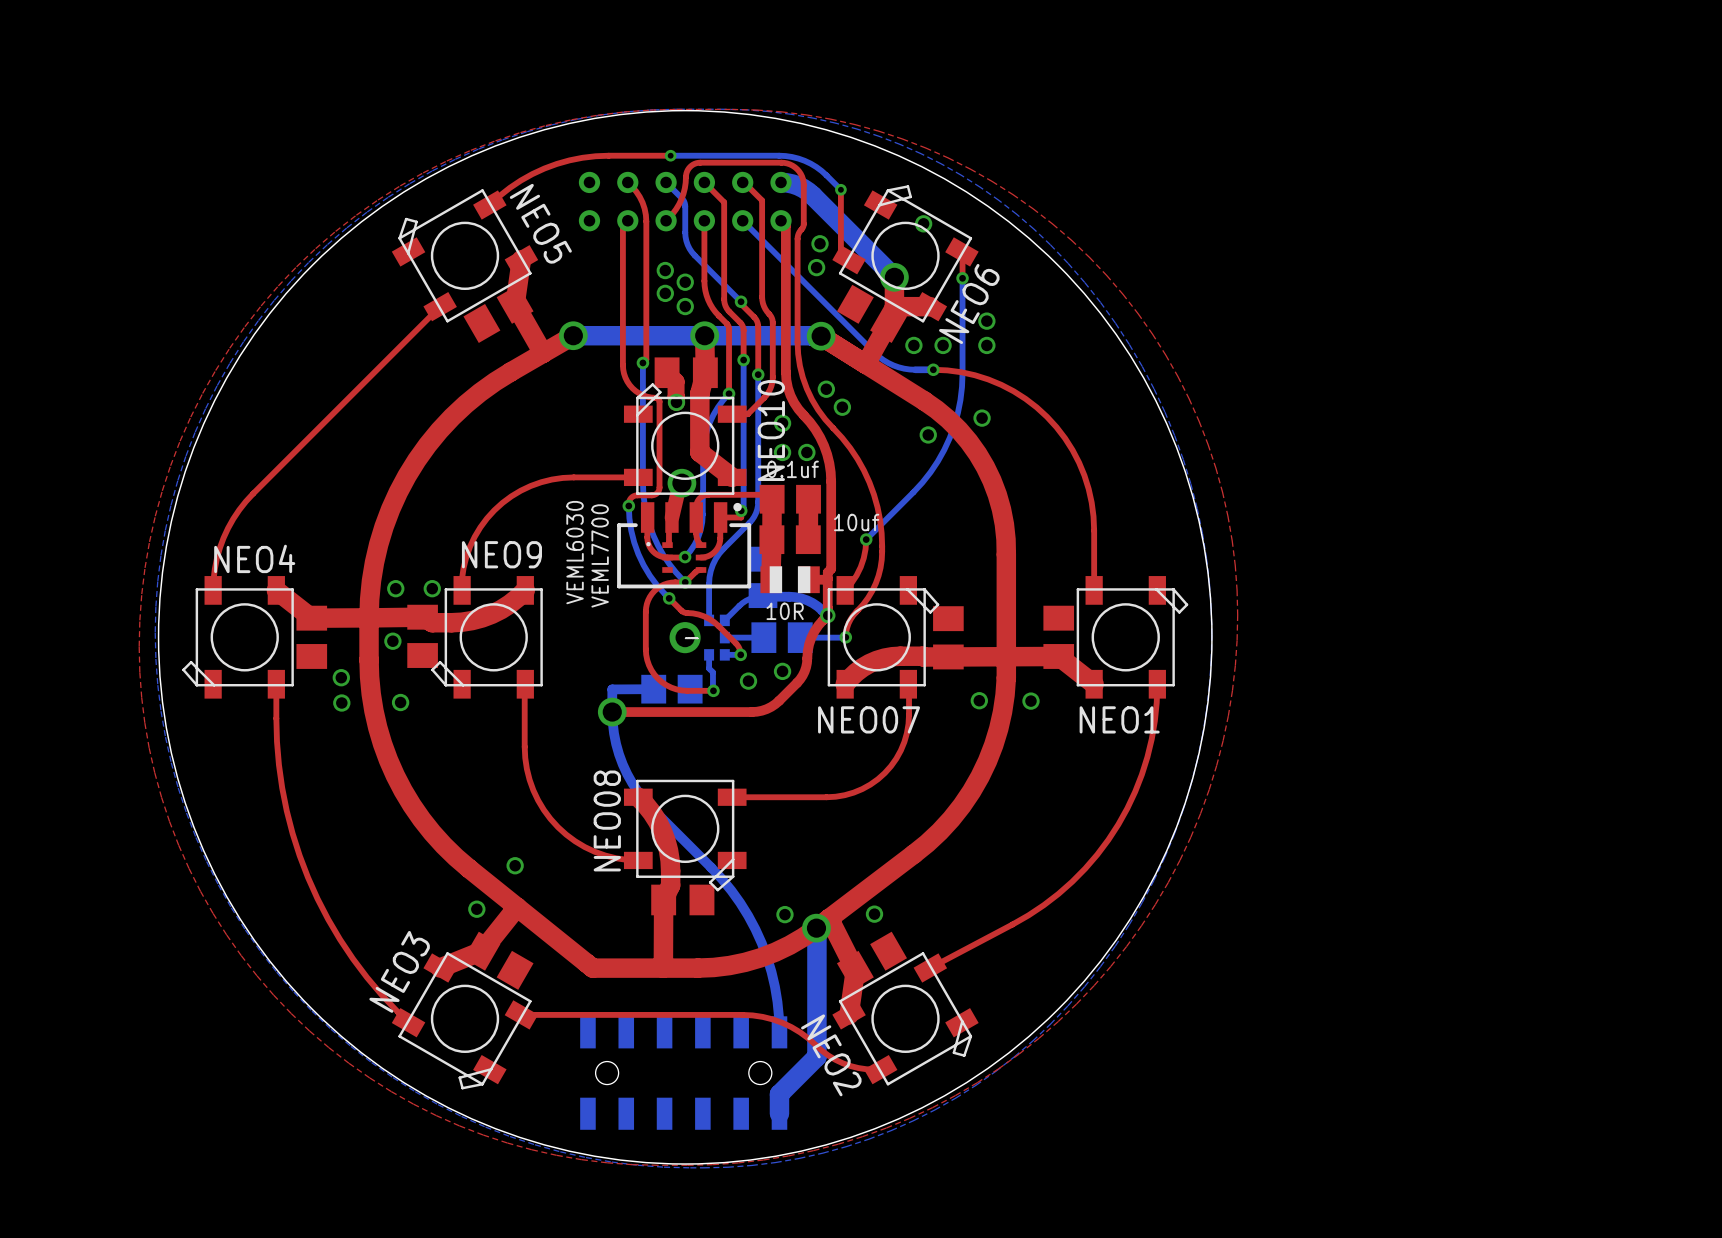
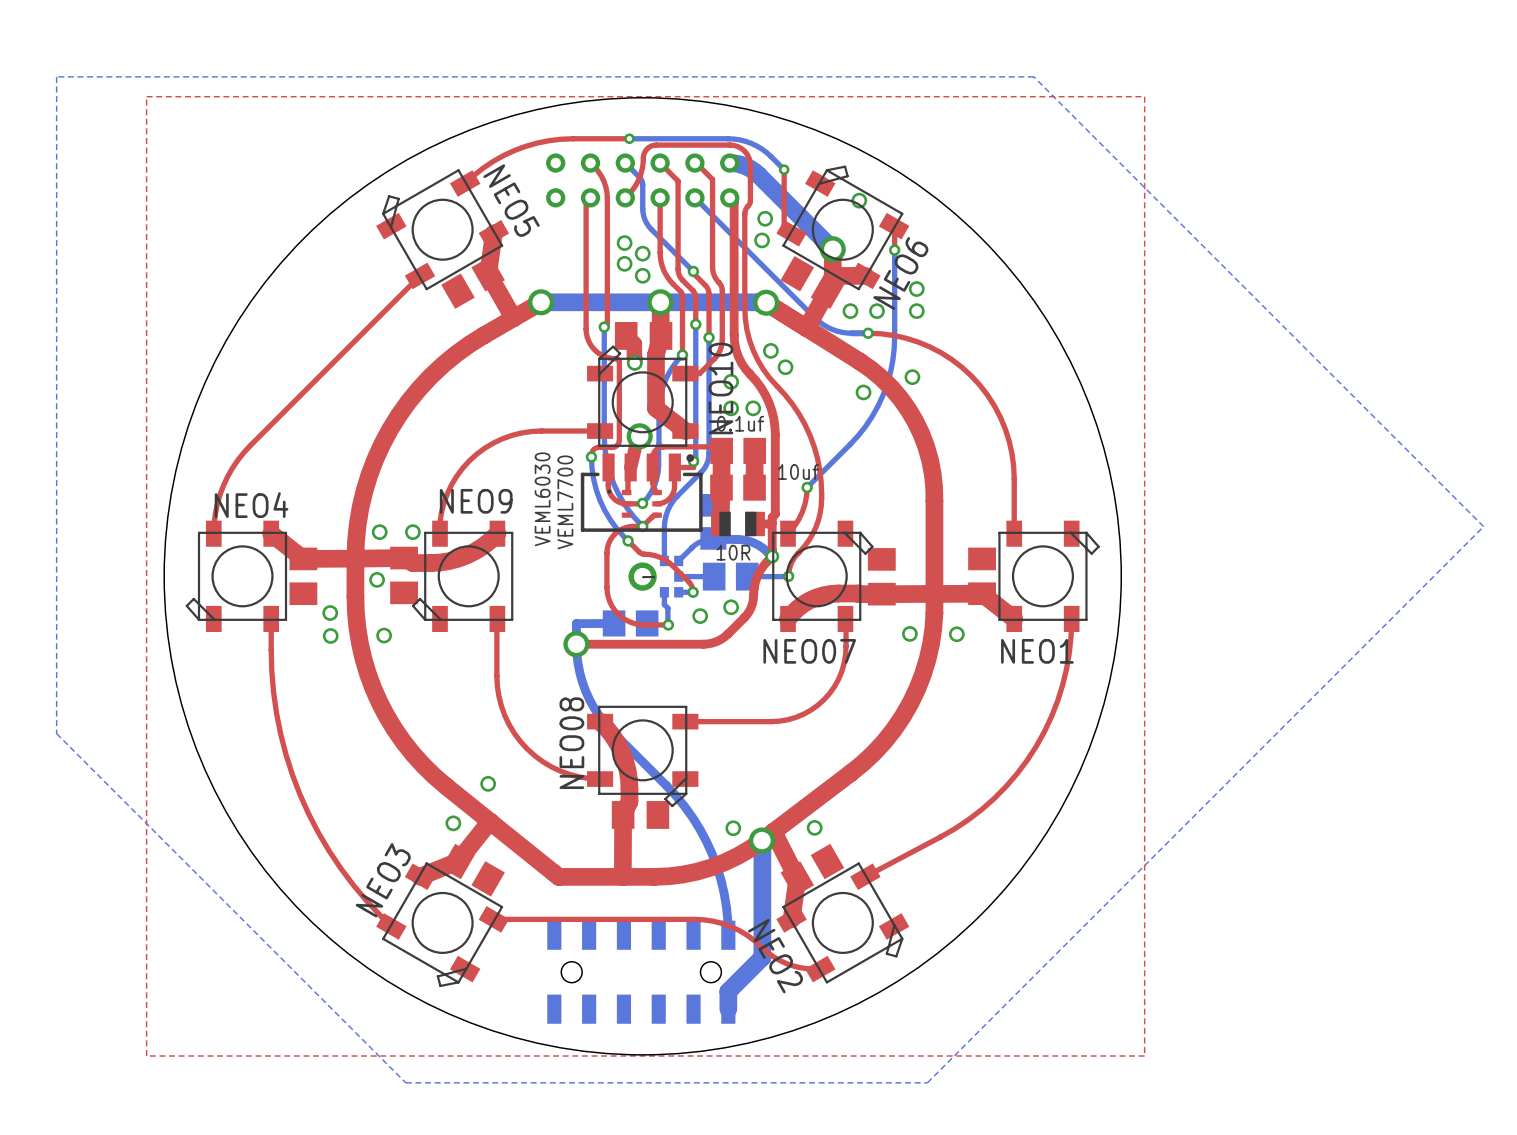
top zone outline: (676, 109) (623, 112) (571, 119) (520, 132) (470, 150) (423, 172) (377, 199) (335, 231) (296, 266) (261, 305) (229, 348) (202, 393) (180, 441) (162, 490) (149, 541) (141, 594) (139, 646) (141, 697) (149, 747) (161, 797) (178, 845) (200, 891) (226, 934) (256, 975) (291, 1013) (328, 1047) (369, 1077) (413, 1104) (459, 1125) (507, 1142) (556, 1155) (606, 1162) (657, 1165) -> (634, 96) (146, 96) (146, 1056) (617, 1056)
bottom zone outline: (678, 109) (745, 109) (791, 114) (835, 123) (879, 136) (921, 153) (961, 175) (998, 200) (1033, 229) (1084, 282) (1115, 323) (1142, 366) (1164, 411) (1183, 459) (1197, 508) (1206, 558) (1211, 609) (1211, 659) (1206, 710) (1197, 760) (1183, 809) (1164, 857) (1142, 902) (1115, 946) (1084, 986) (1050, 1024) (1014, 1056) (976, 1085) (934, 1109) (868, 1139) (822, 1153) (775, 1162) (727, 1167) (664, 1167) (611, 1162) (560, 1151) (510, 1136) (461, 1116) (415, 1091) (371, 1062) (330, 1029) (293, 992) (260, 951) (231, 907) (206, 861) (186, 813) (171, 762) (161, 711) (155, 658) (155, 607) (160, 555) (170, 505) (185, 456) (205, 408) (229, 363) (258, 320) (290, 281) (327, 244) (366, 212) (431, 171) (478, 149) (526, 131) (576, 119) (627, 111) (678, 109) -> (56, 76) (56, 733) (405, 1082) (927, 1082) (1483, 526) (1033, 76) (56, 76)
top zone outline: (732, 109) (781, 111) (830, 119) (902, 138) (948, 157) (992, 181) (1033, 208) (1071, 240) (1106, 275) (1138, 313) (1165, 355) (1189, 398) (1208, 444) (1222, 492) (1232, 540) (1237, 590) (1237, 640) (1232, 691) (1223, 740) (1209, 789) (1190, 837) (1168, 882) (1126, 946) (1094, 985) (1058, 1021) (1019, 1054) (977, 1082) (932, 1107) (886, 1128) (838, 1144) (788, 1155) (738, 1162) (687, 1165) -> (685, 96) (1144, 96) (1144, 1056) (644, 1056)

